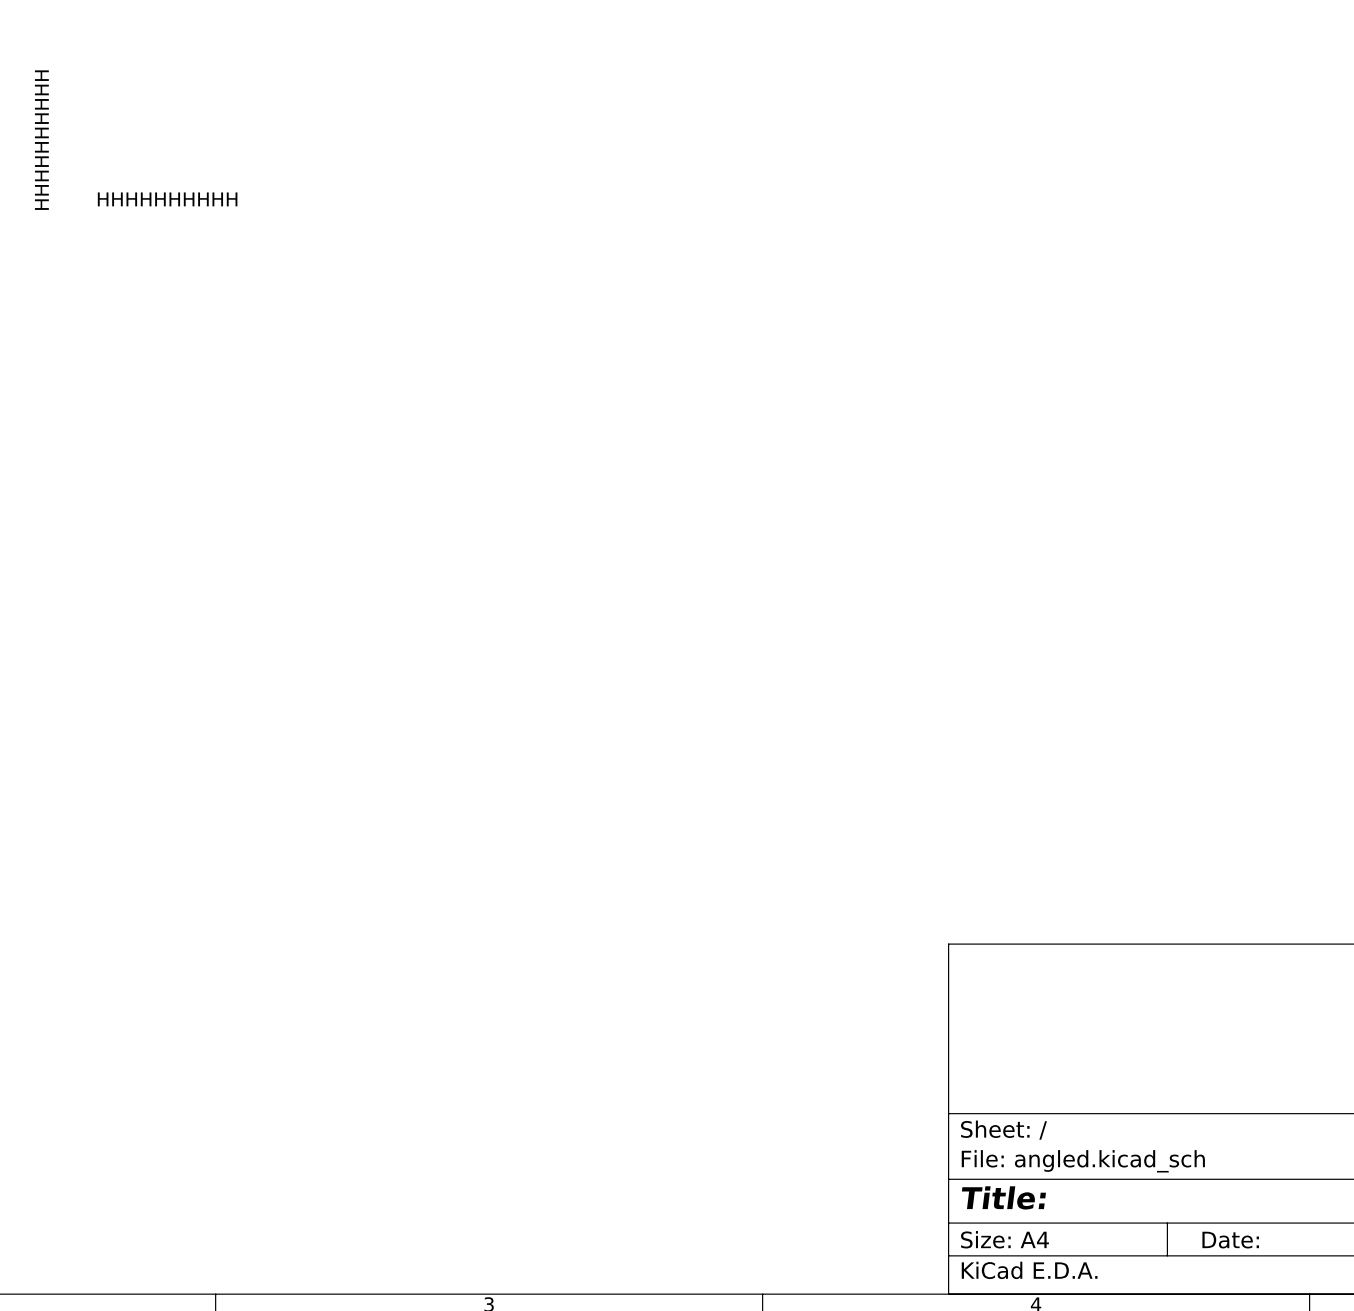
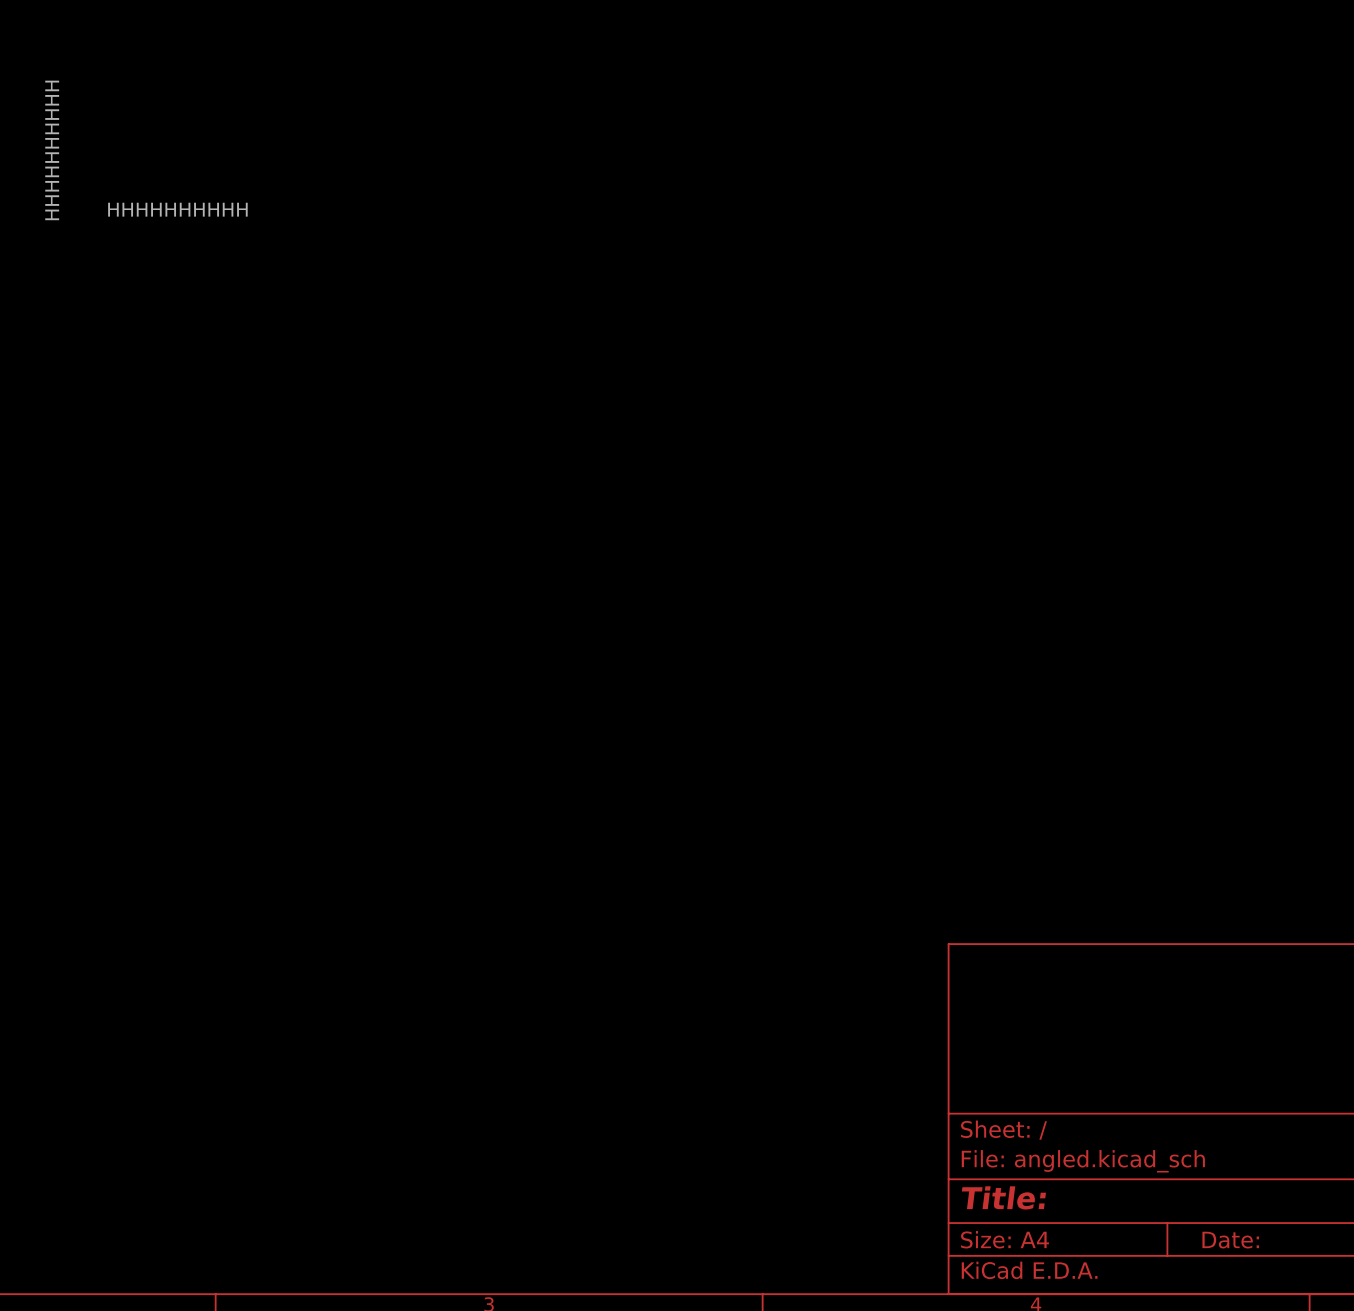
label position: HHHHHHHHHH (41, 140) -> HHHHHHHHHH (52, 150)
label position: HHHHHHHHHH (167, 199) -> HHHHHHHHHH (177, 209)

